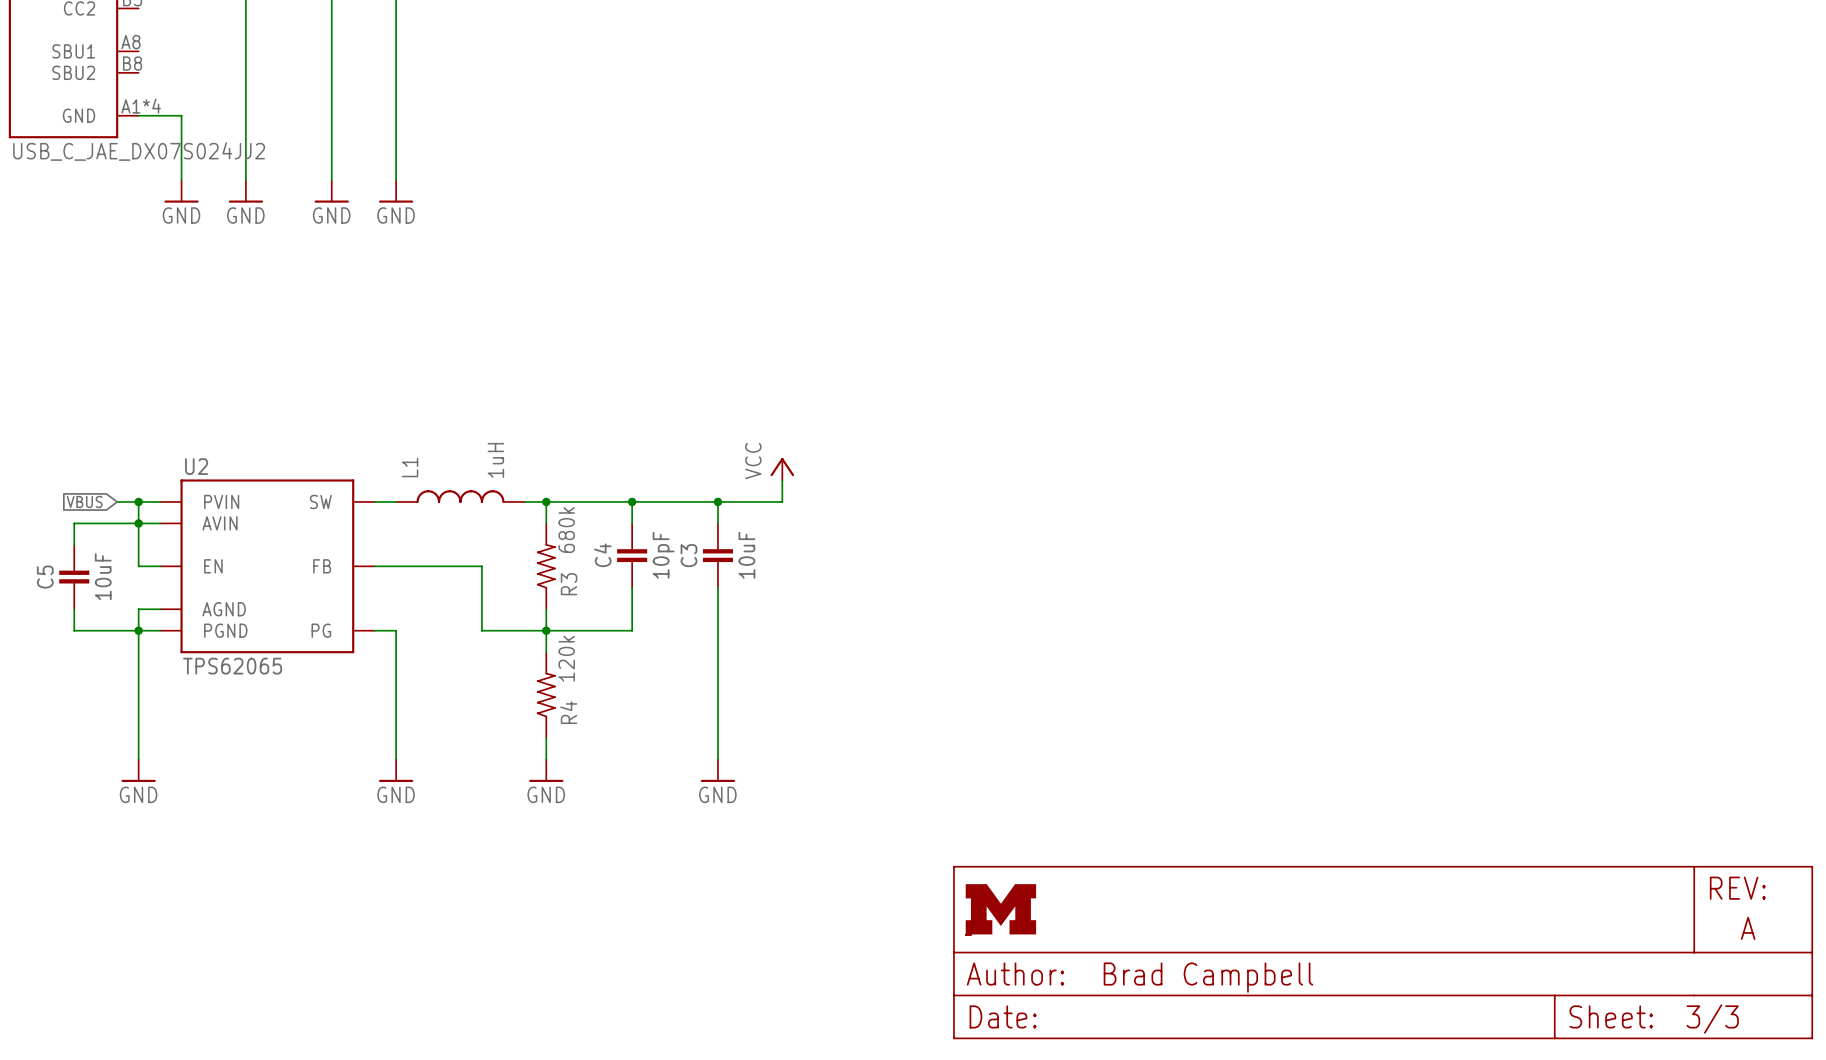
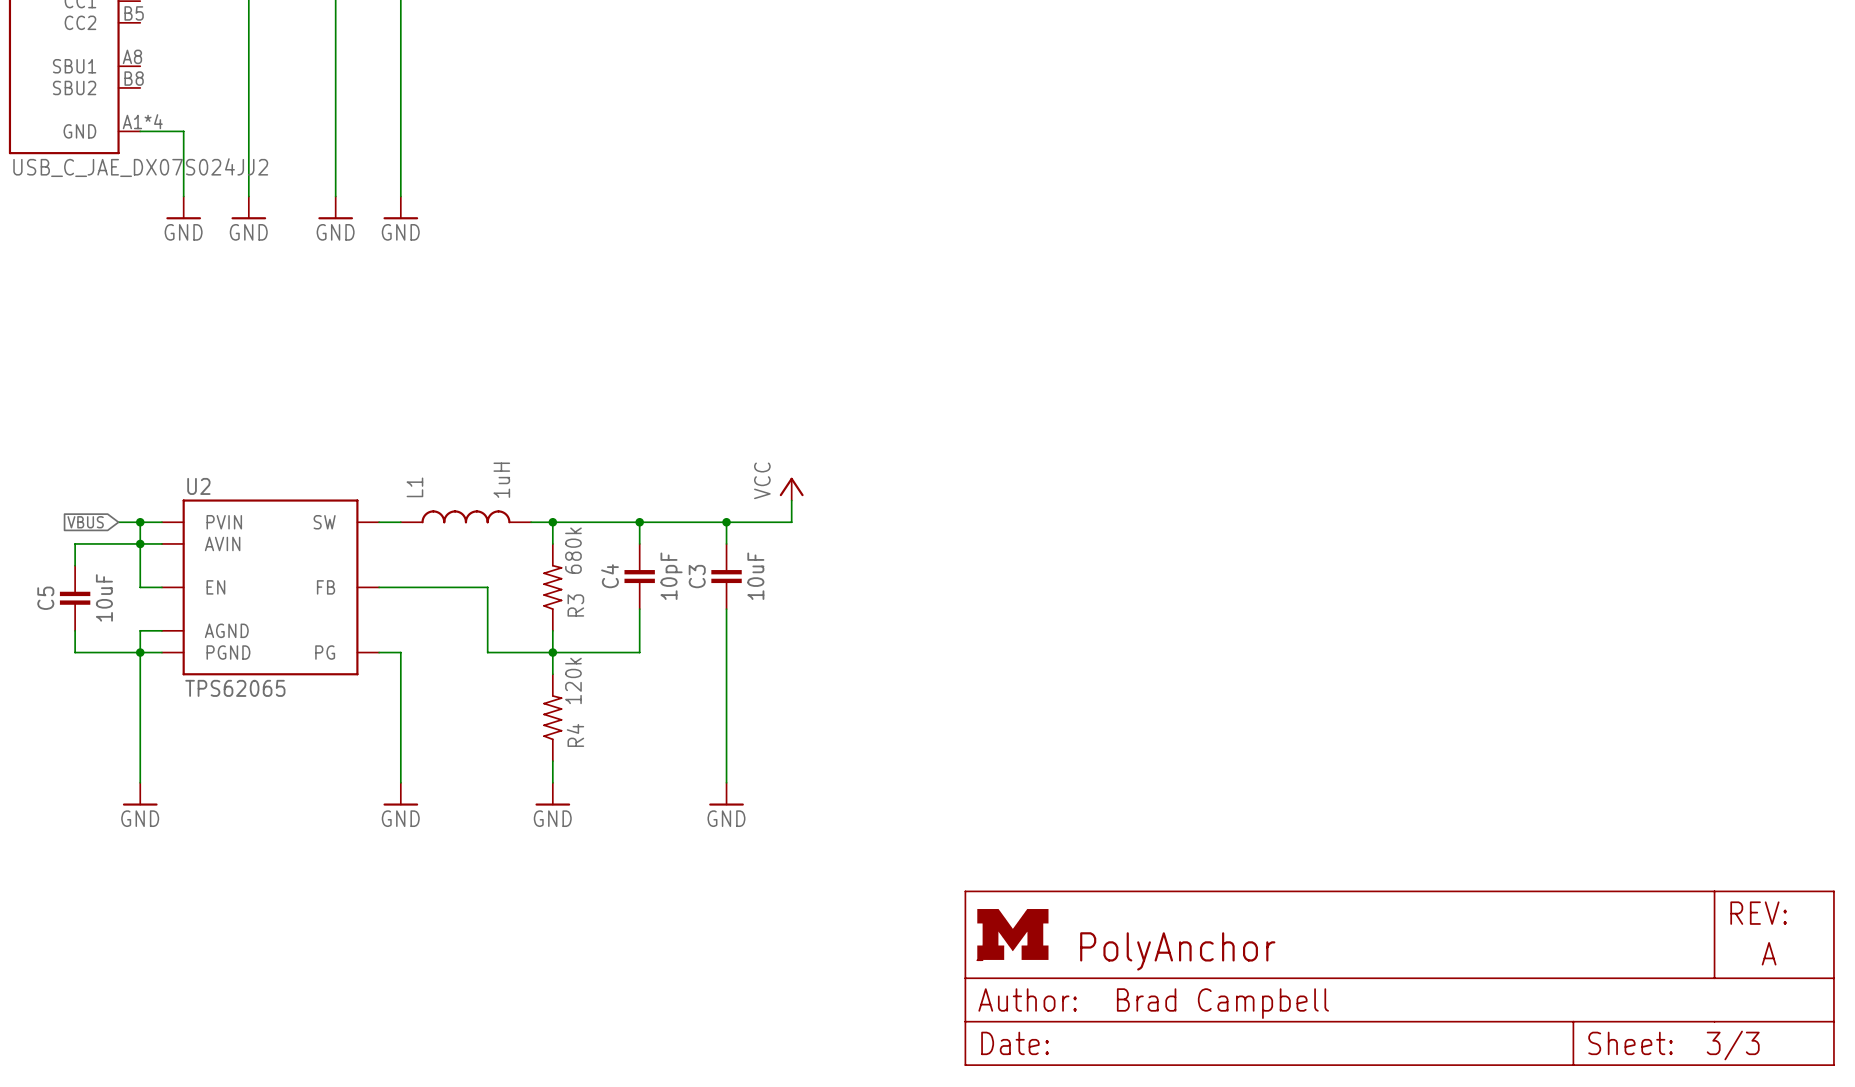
part text: none -> PolyAnchor (1177, 951)

